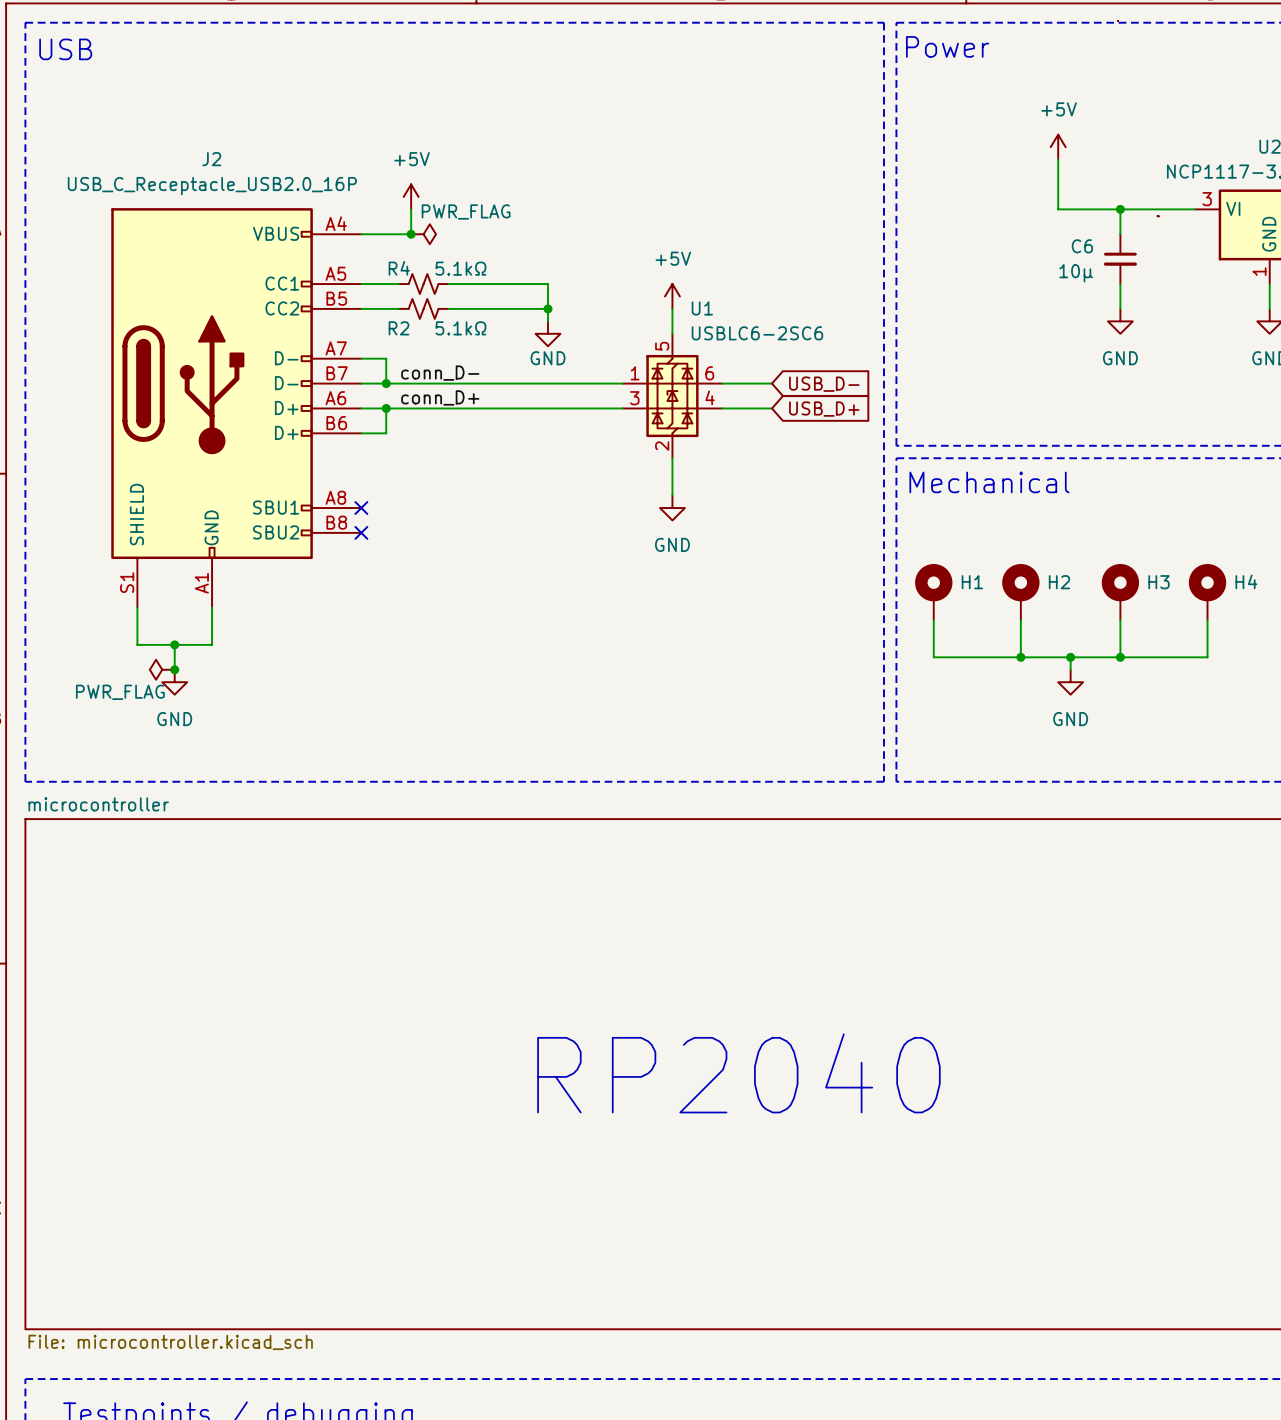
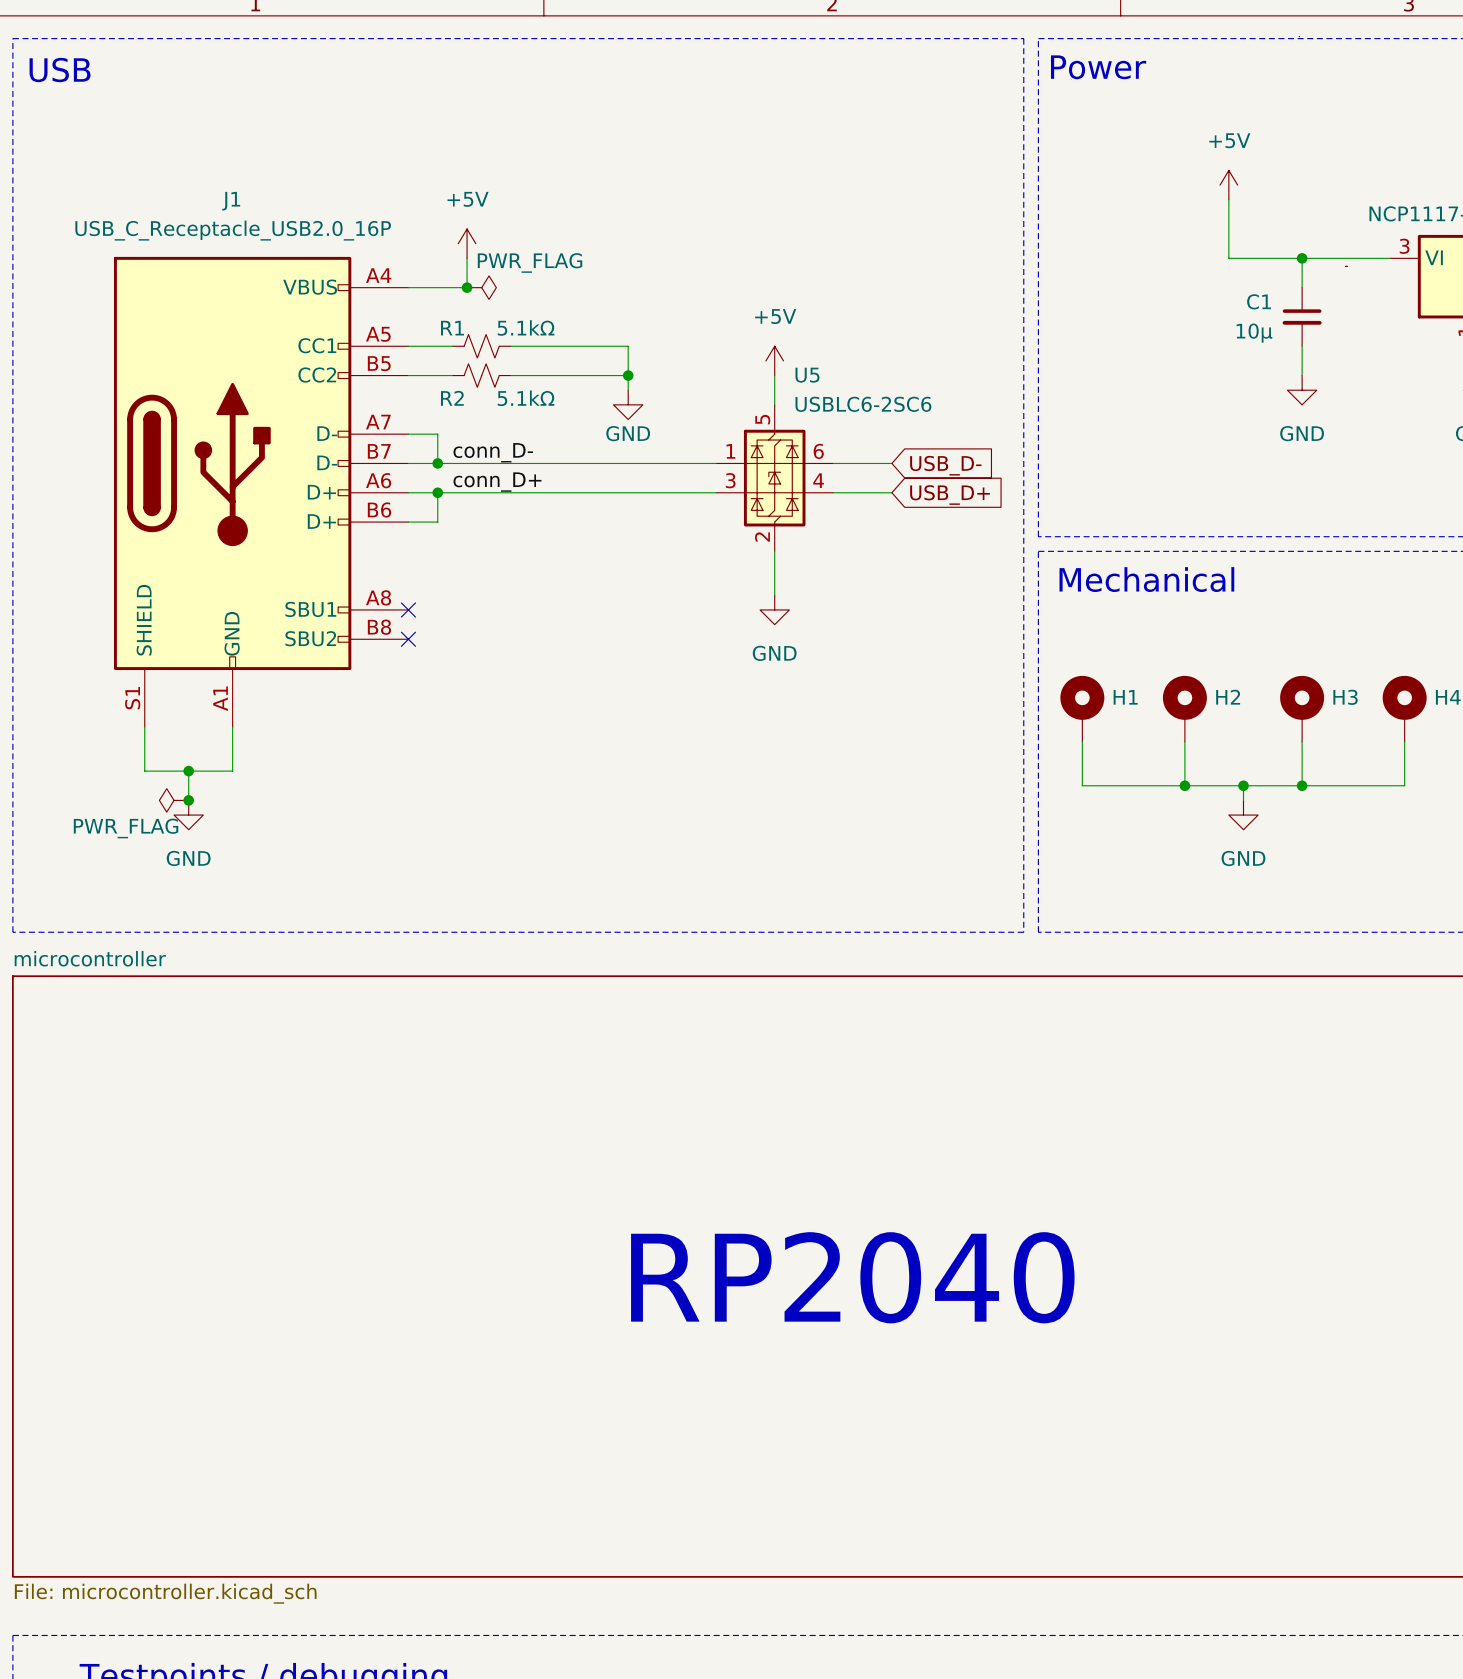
J2 name: J2 (211, 159) -> J1 (231, 201)
C6 name: C6 (1082, 246) -> C1 (1259, 301)
R4 name: R4 (399, 268) -> R1 (452, 328)
U1 name: U1 (702, 308) -> U5 (807, 375)

